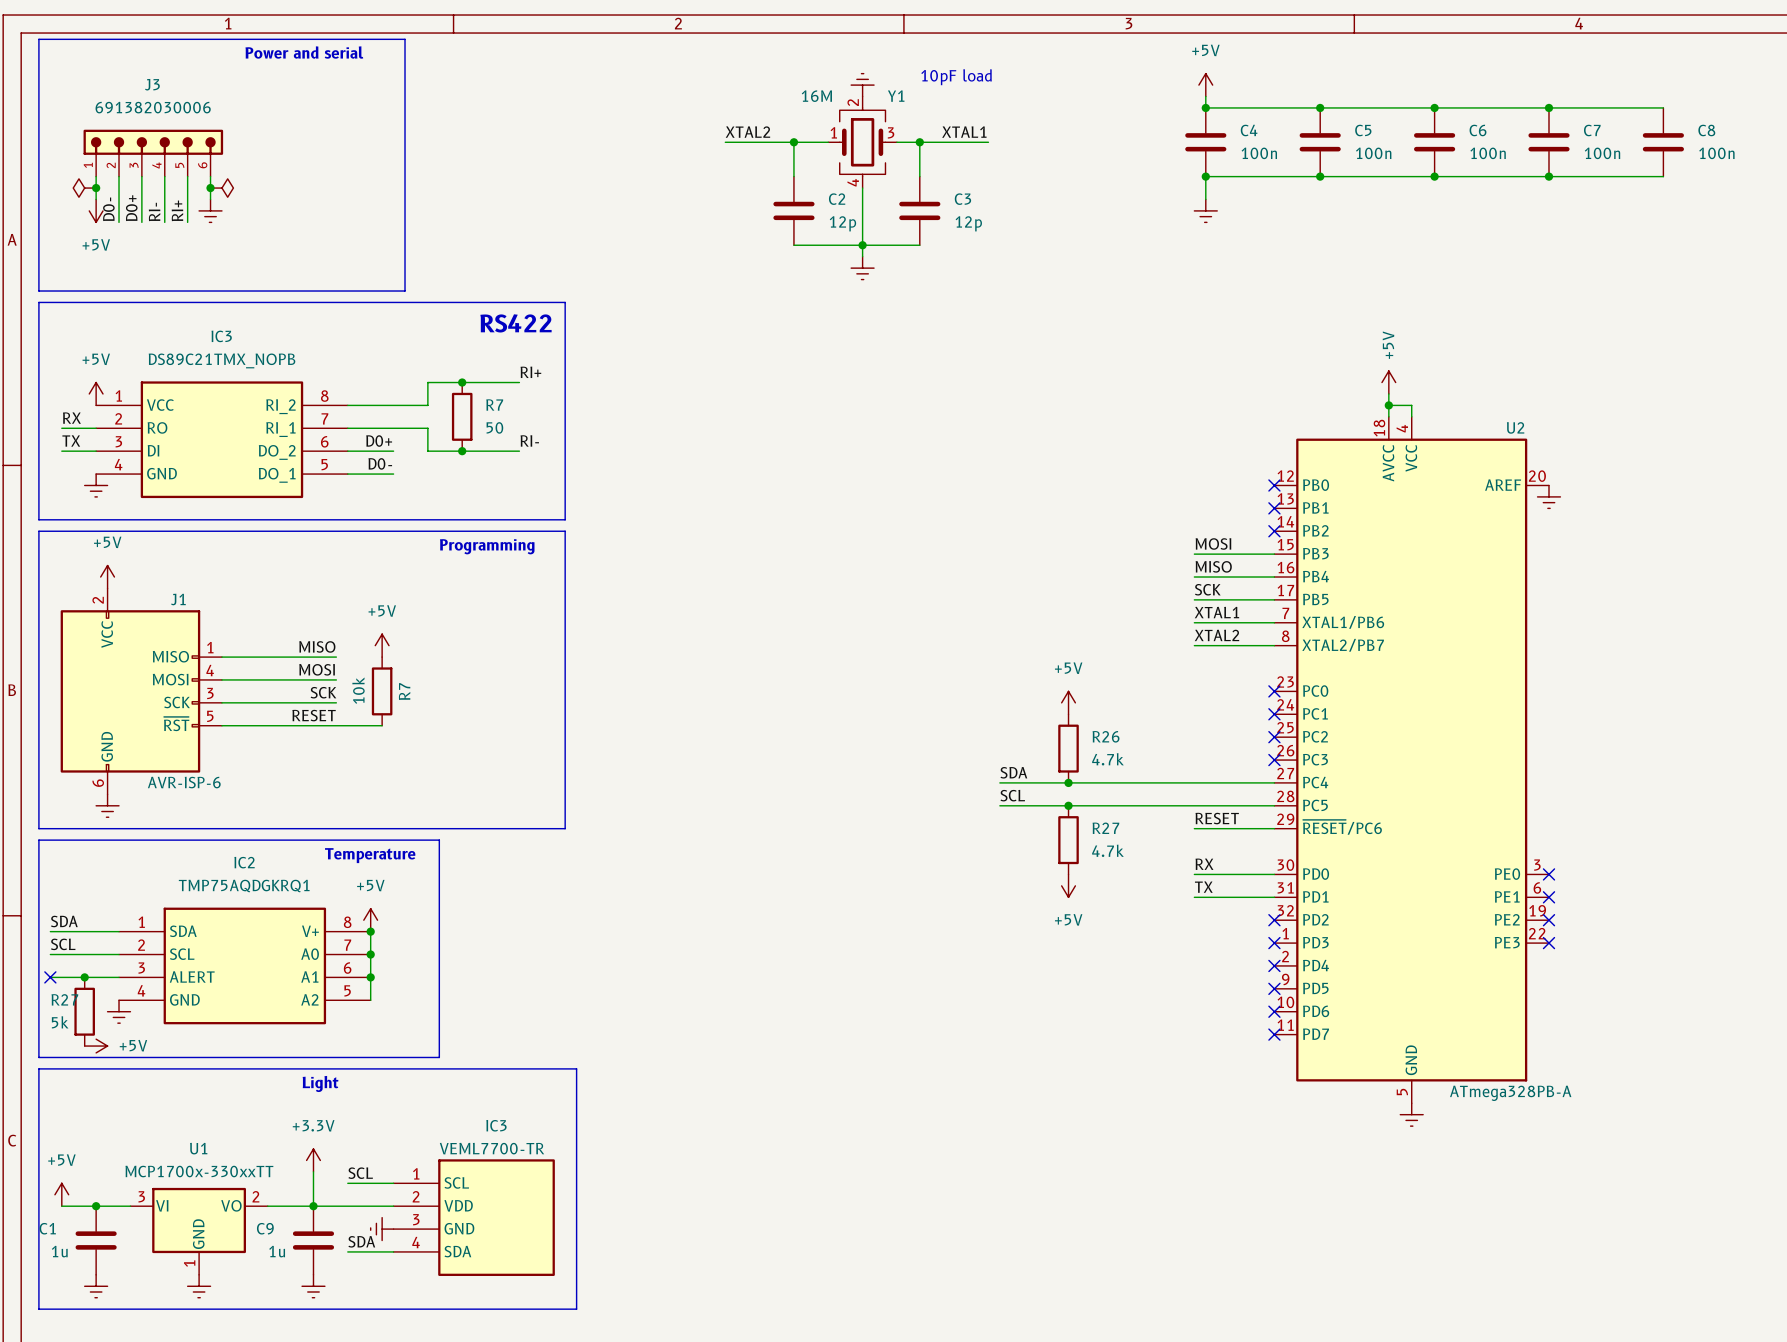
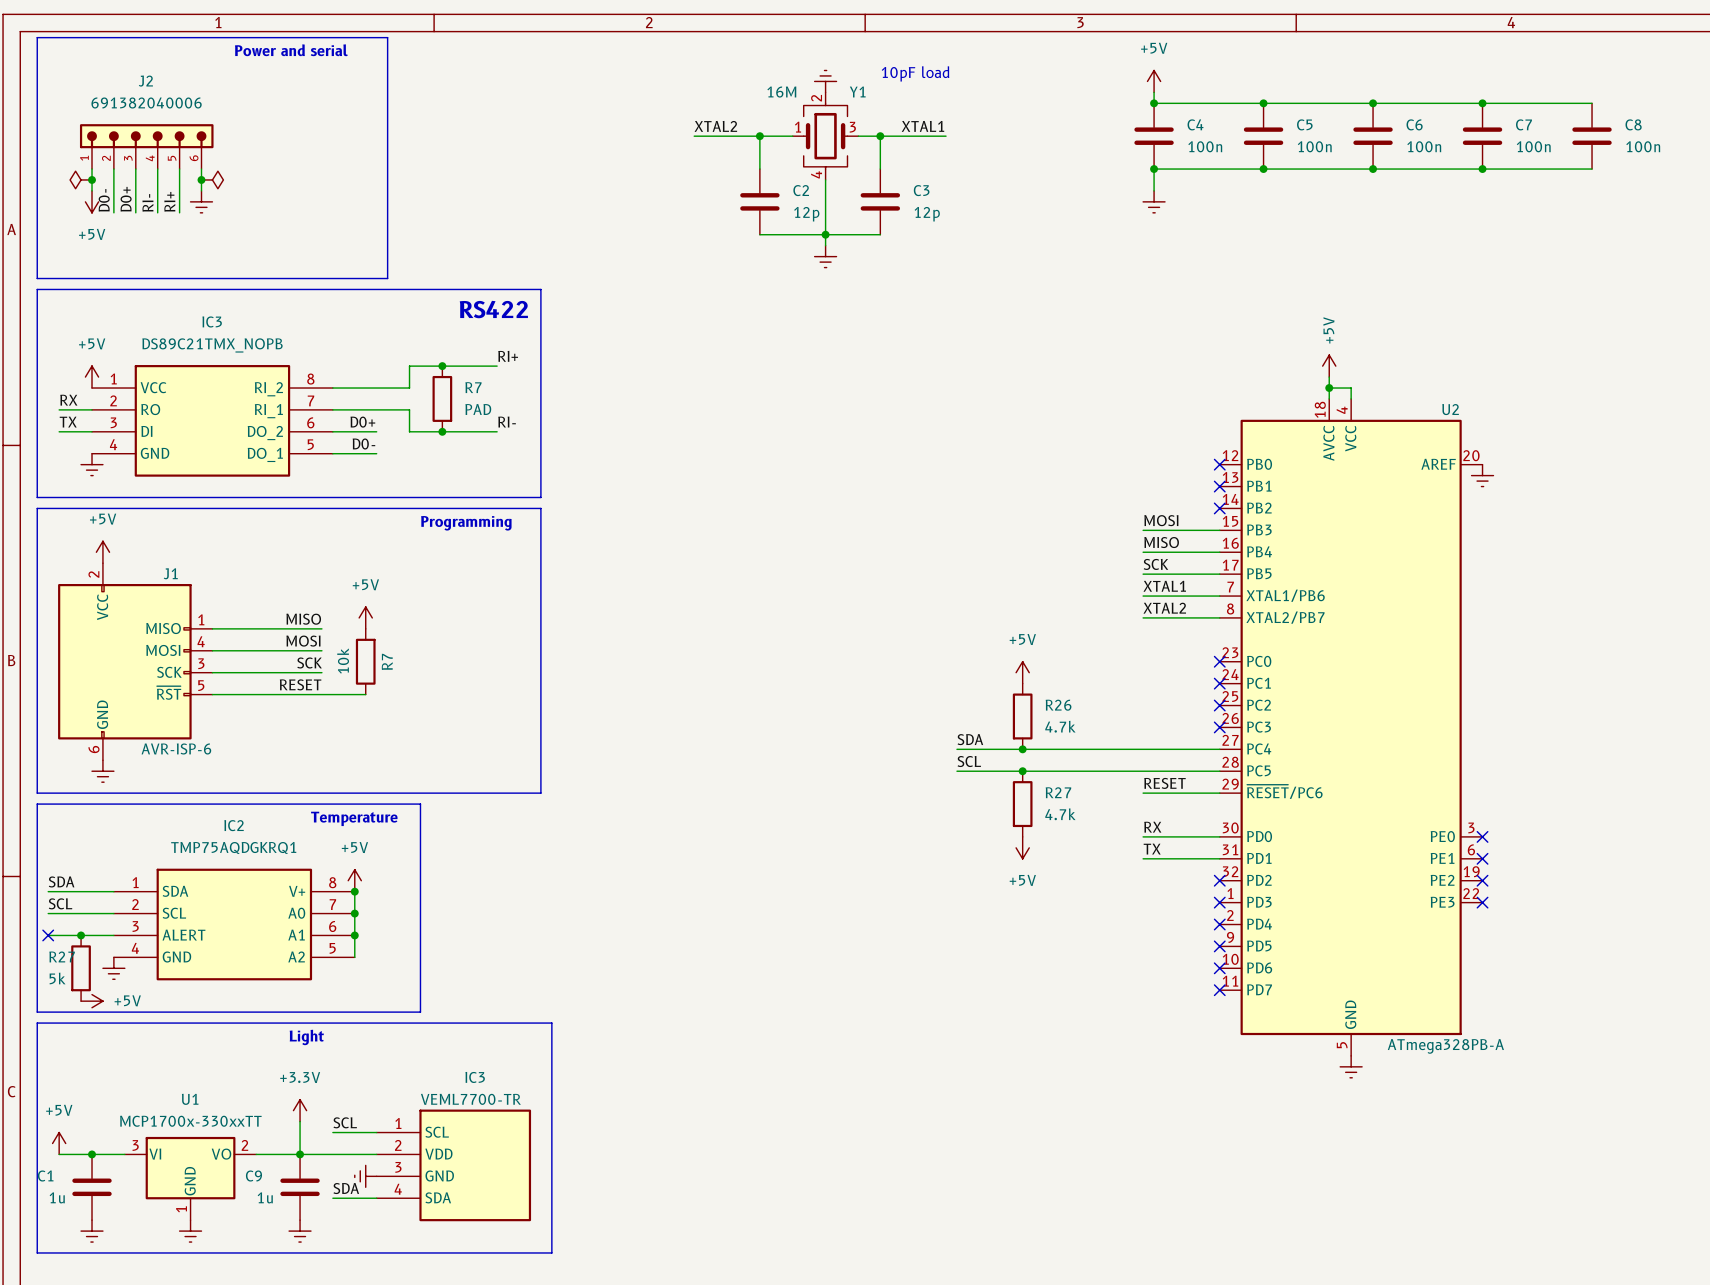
J3 name: J3 (152, 84) -> J2 (145, 81)
J3 value: 691382030006 (153, 107) -> 691382040006 (146, 102)
R7 value: 50 (494, 427) -> PAD (478, 409)

